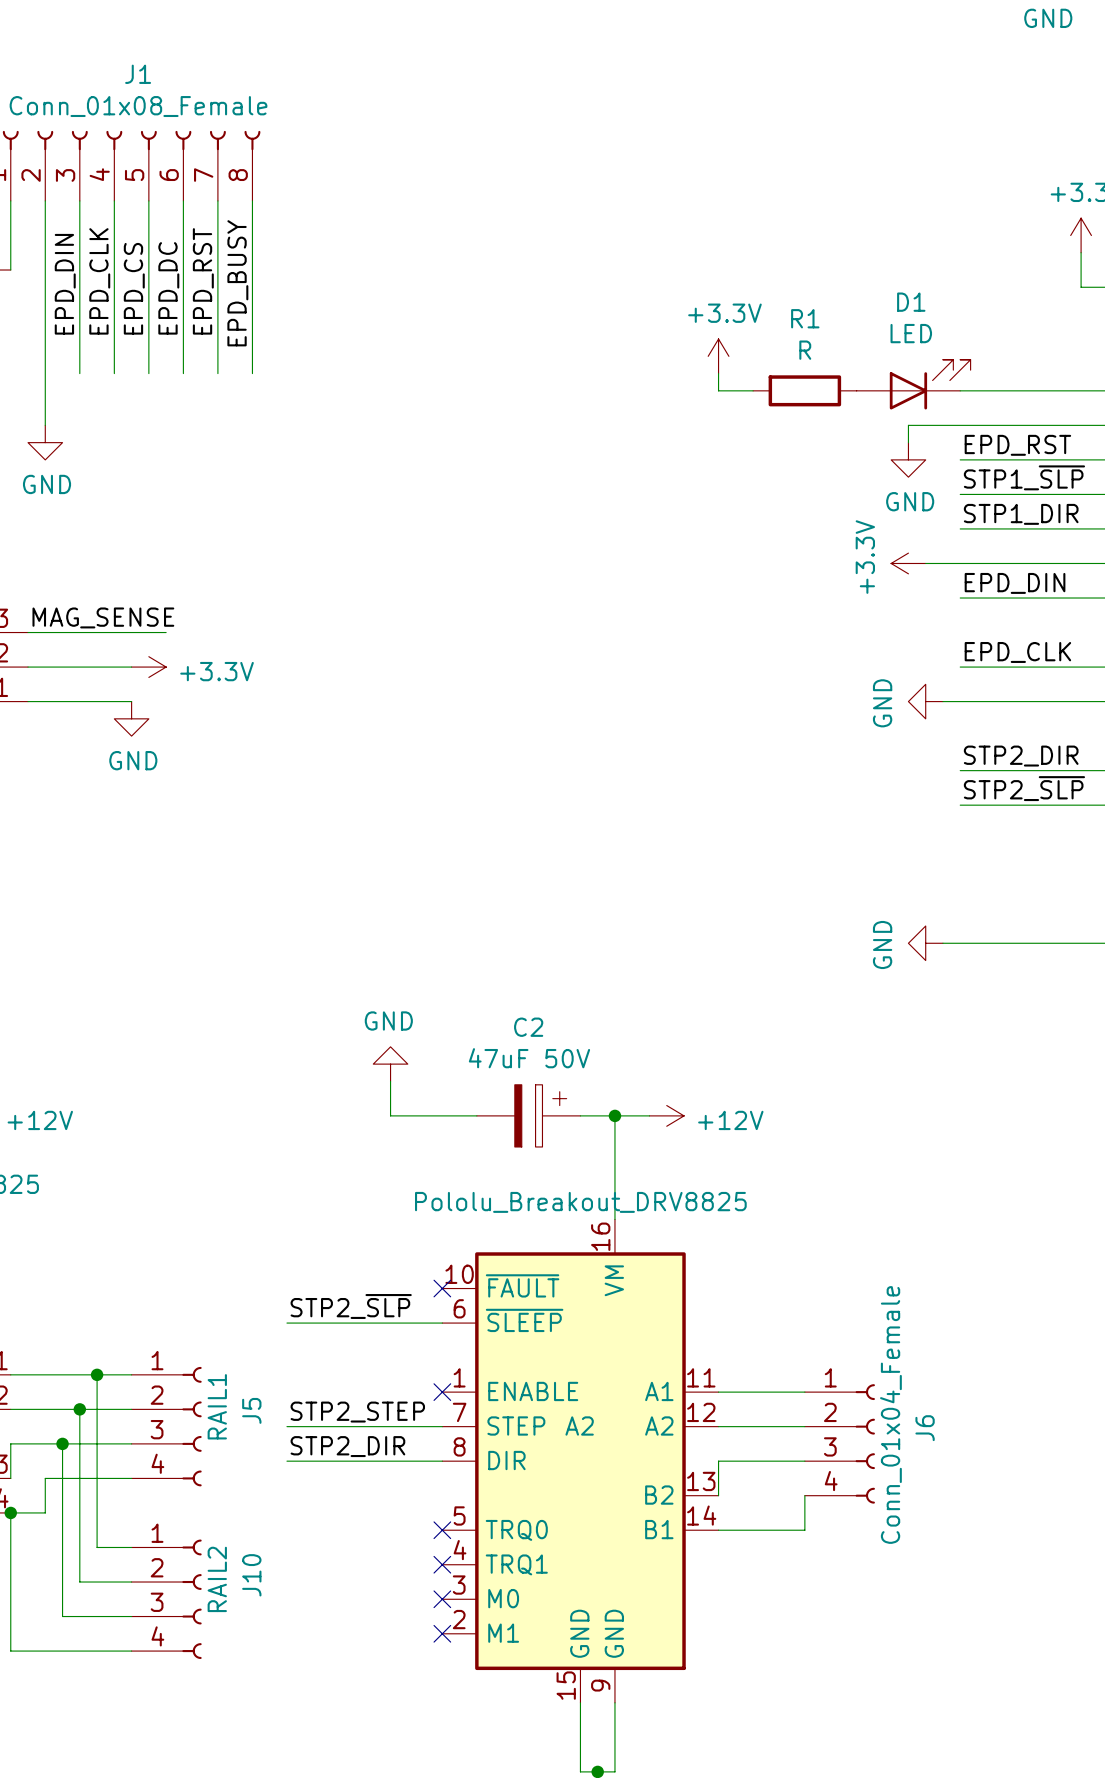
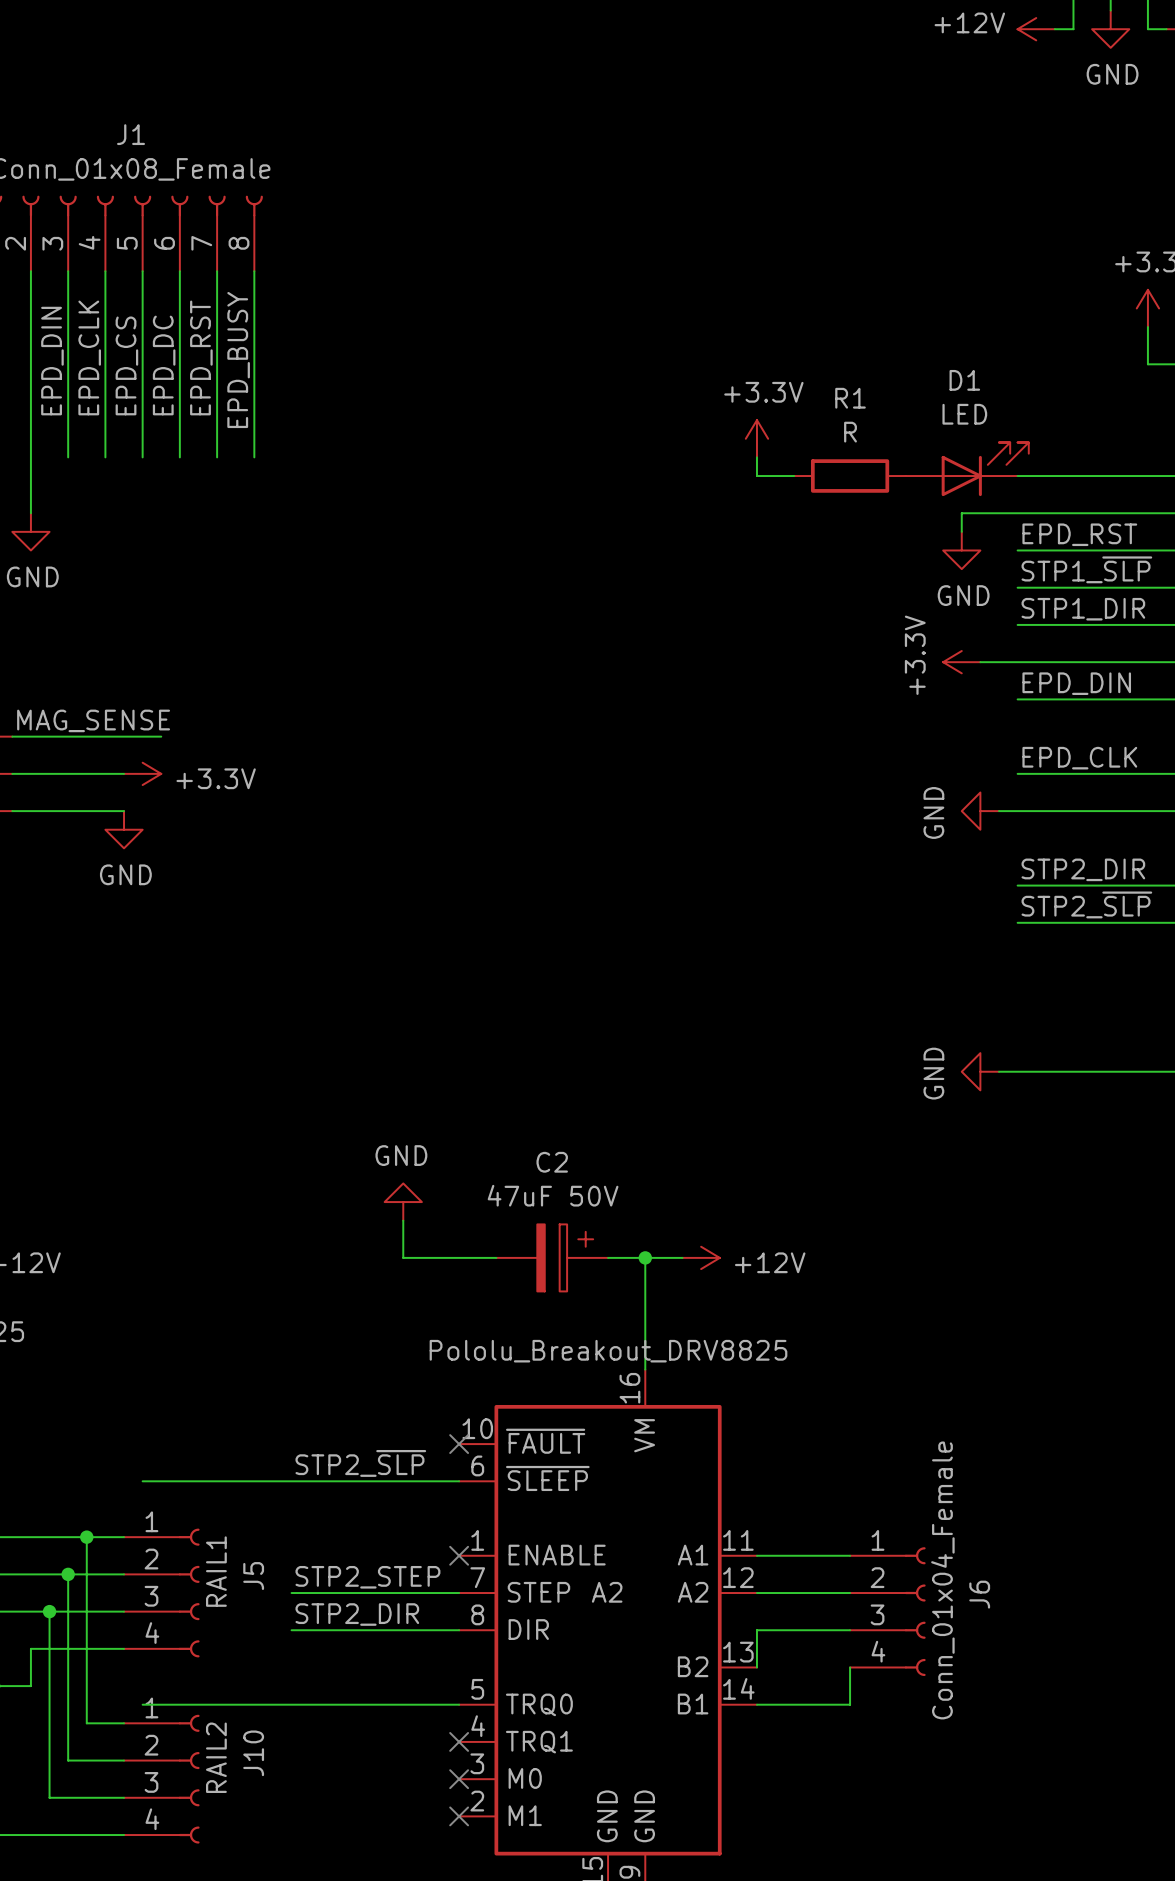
wire: none -> (142, 1481) (291, 1481)
wire: none -> (142, 1704) (459, 1704)
no-connect mark: (442, 1530) -> none

